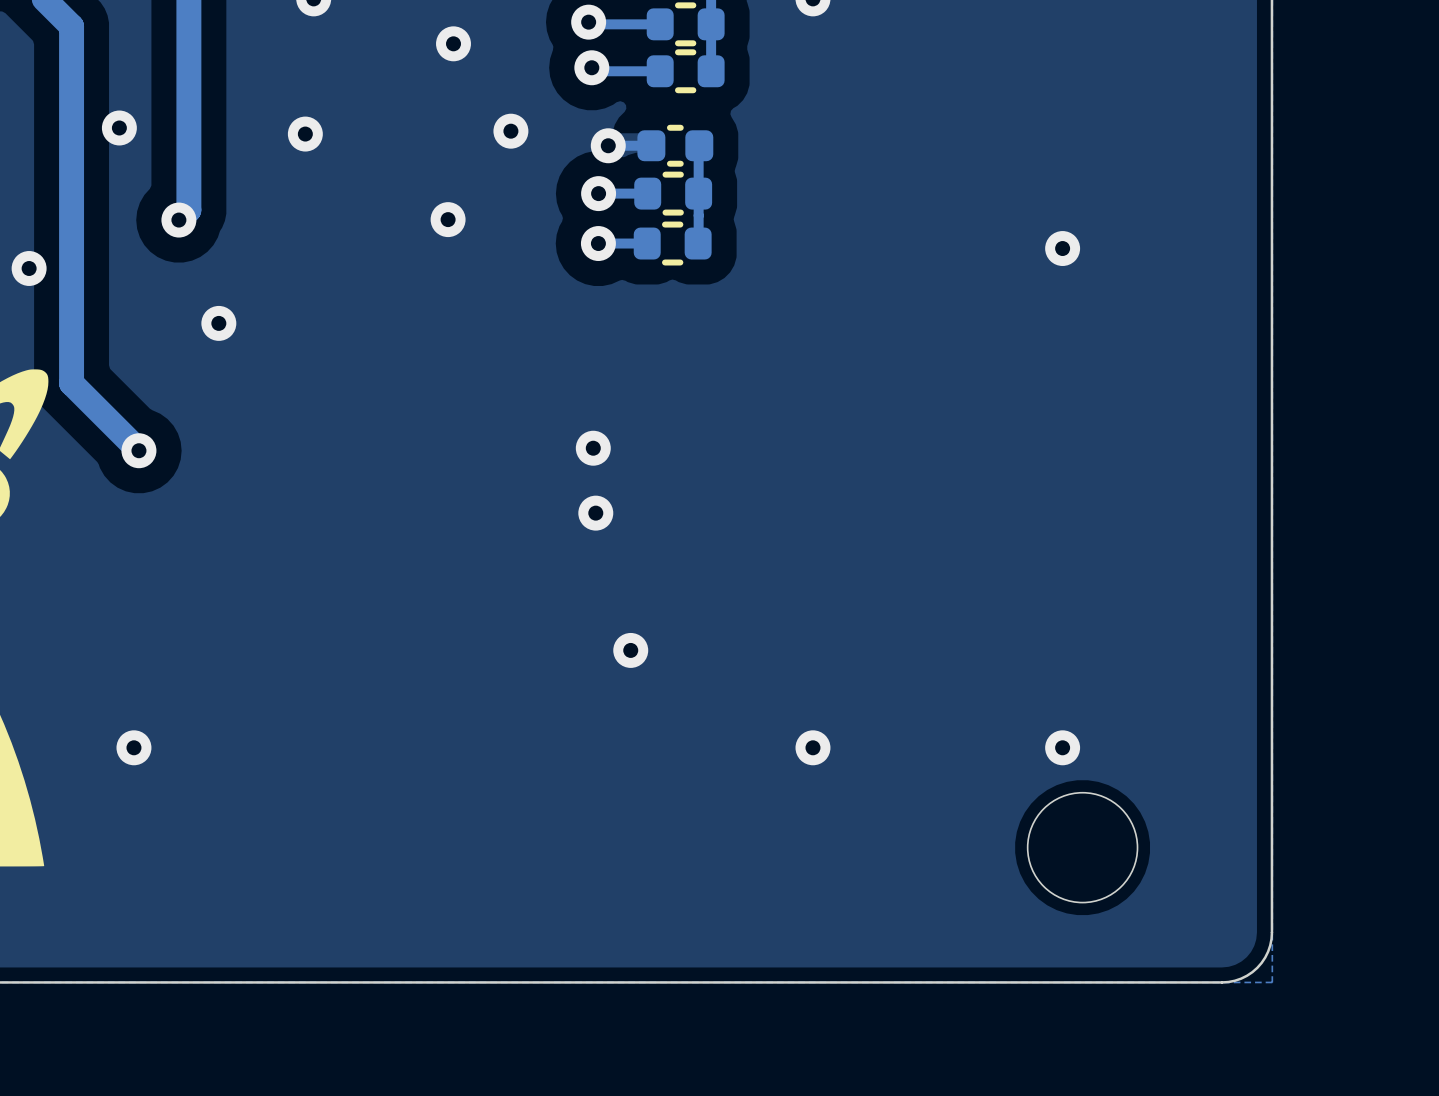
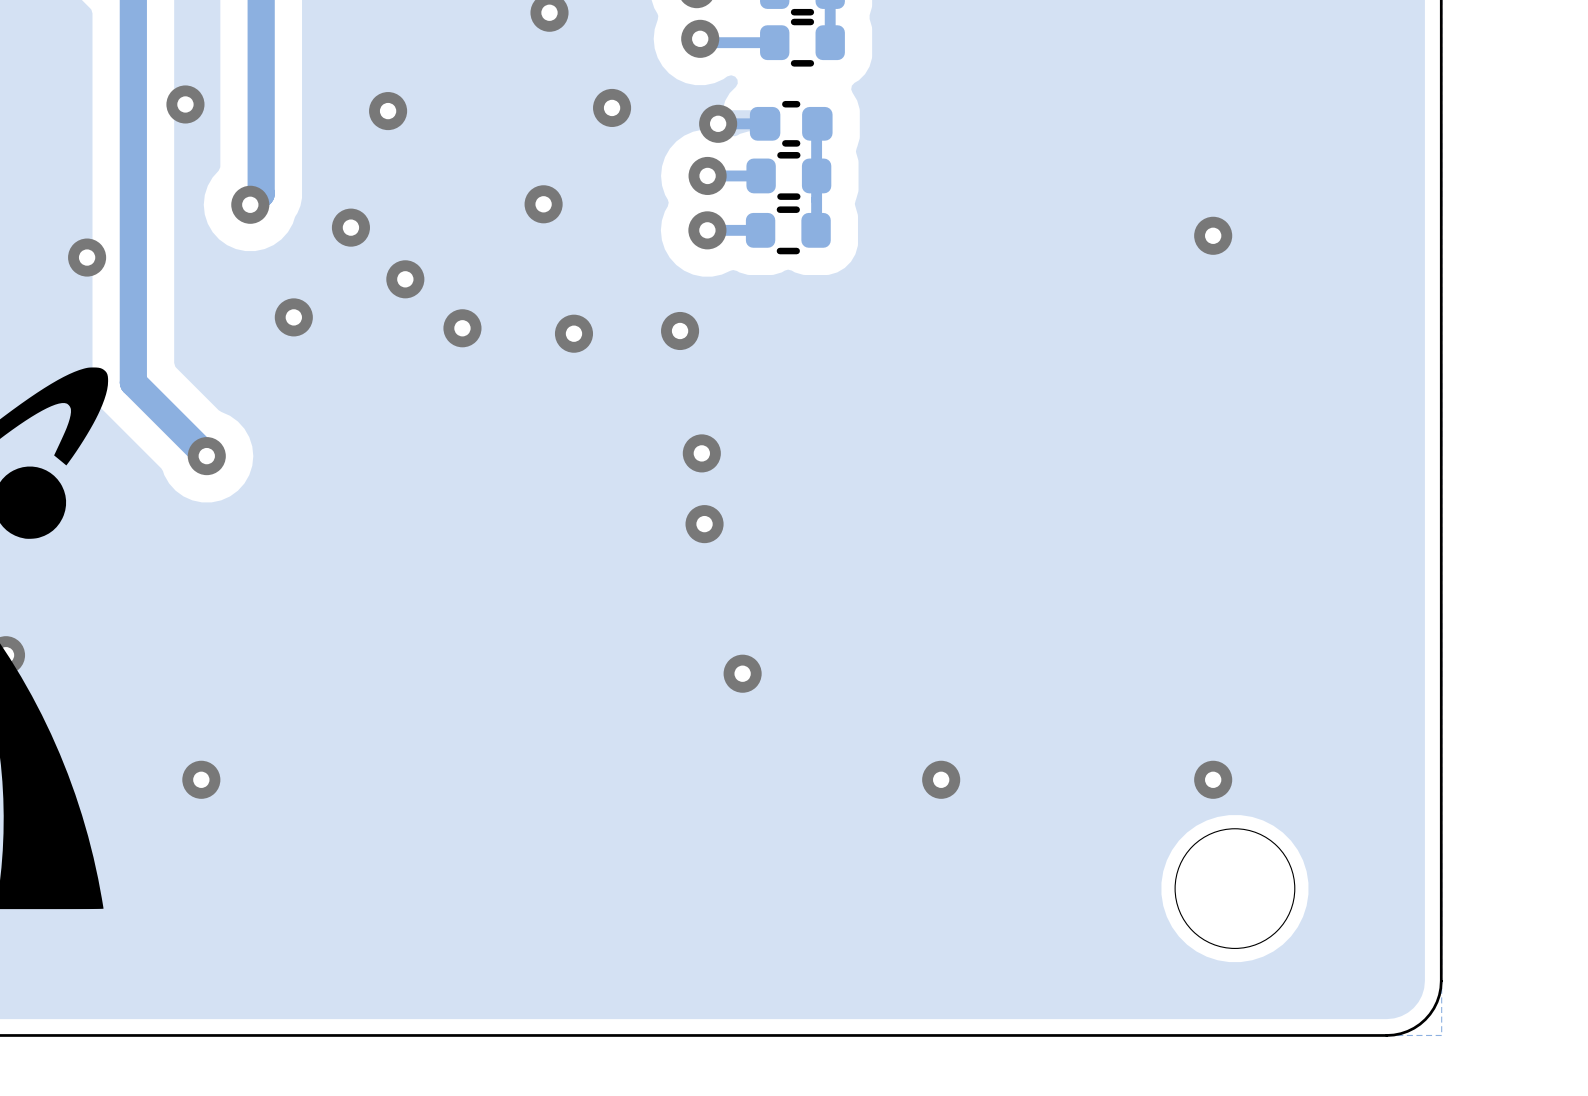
via: none -> (350, 227)
via: none -> (405, 279)
via: none -> (462, 328)
via: none -> (680, 330)
via: none -> (573, 333)

